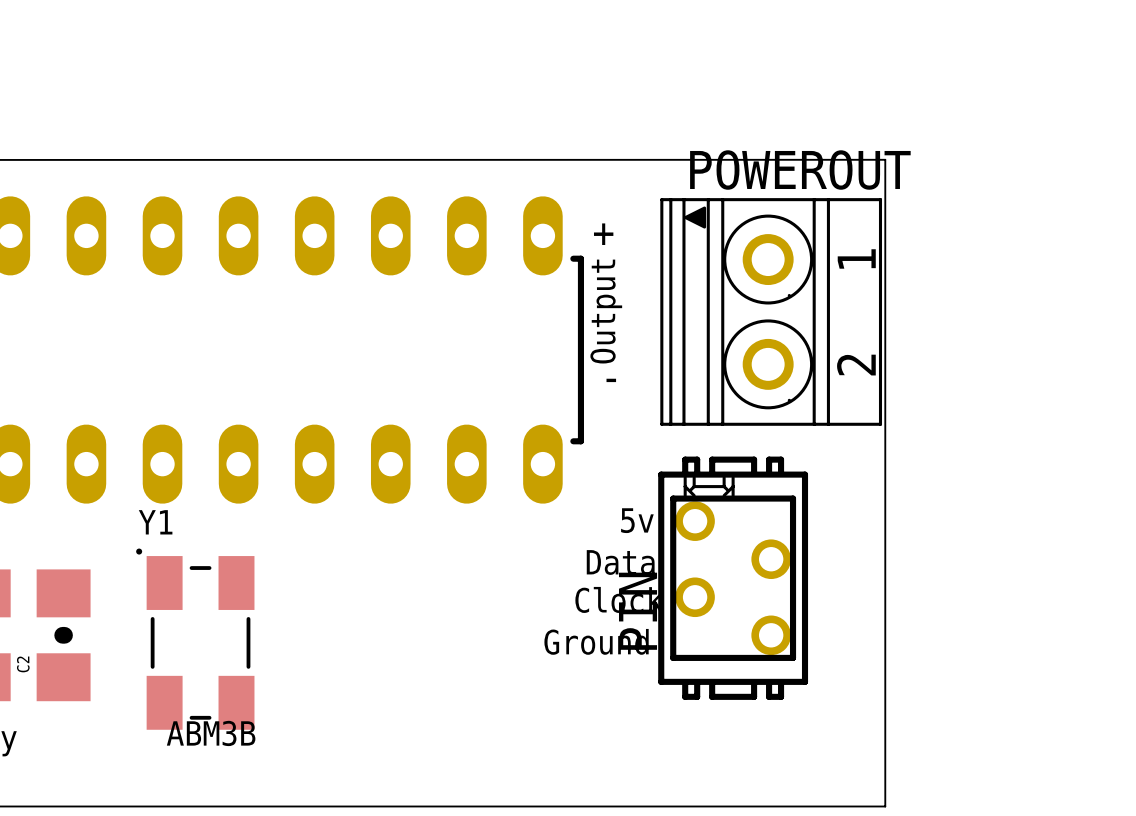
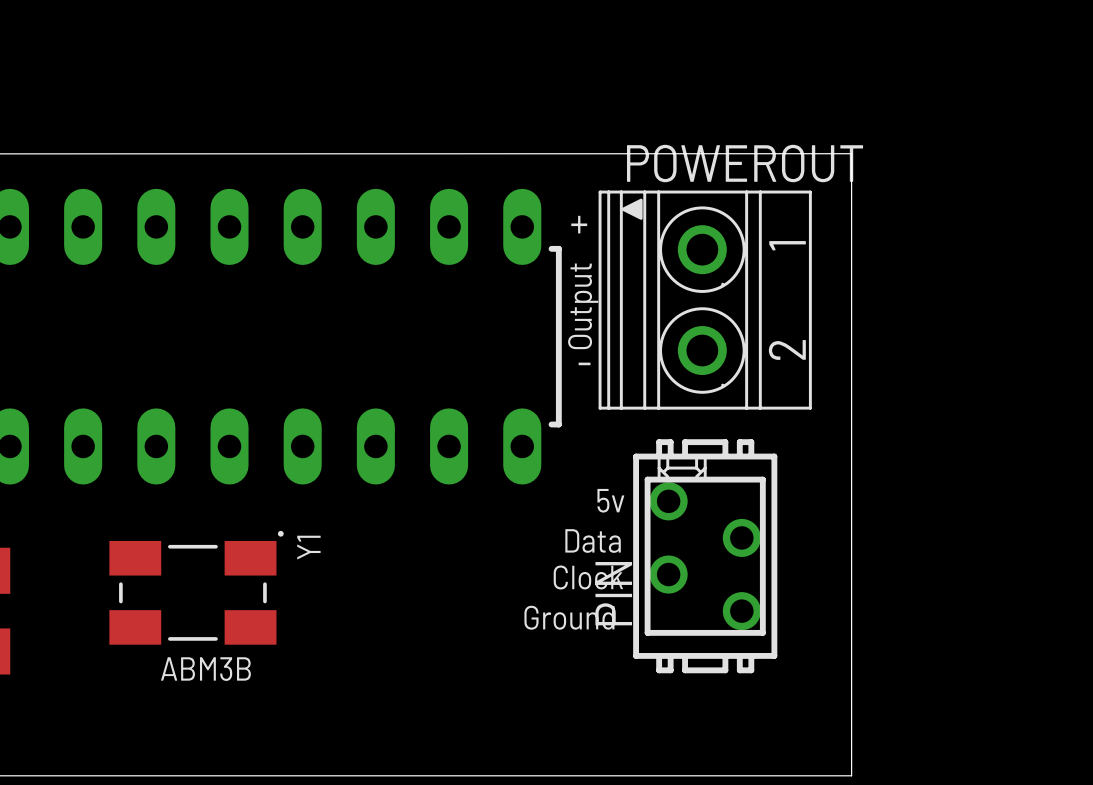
POWEROUT position: (771, 311) -> (705, 300)
C2: (63, 635) -> none
Y1 rotation: 0° (195, 639) -> 90° clockwise (196, 587)
text position: ABM3B (211, 733) -> ABM3B (205, 669)

